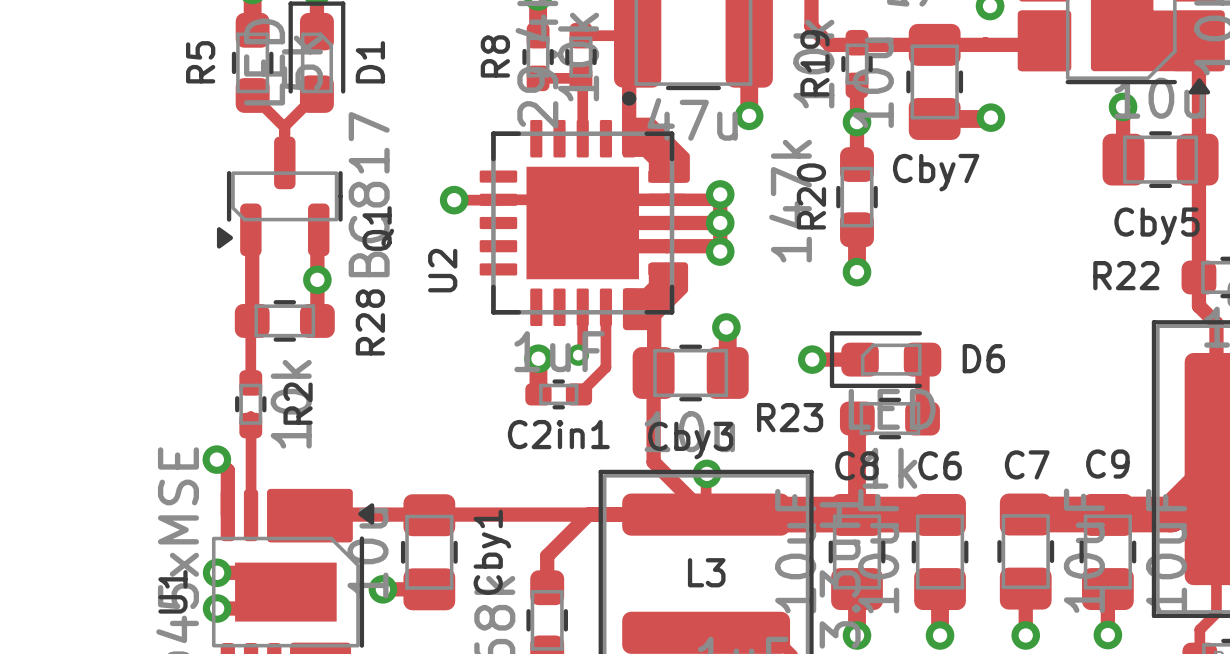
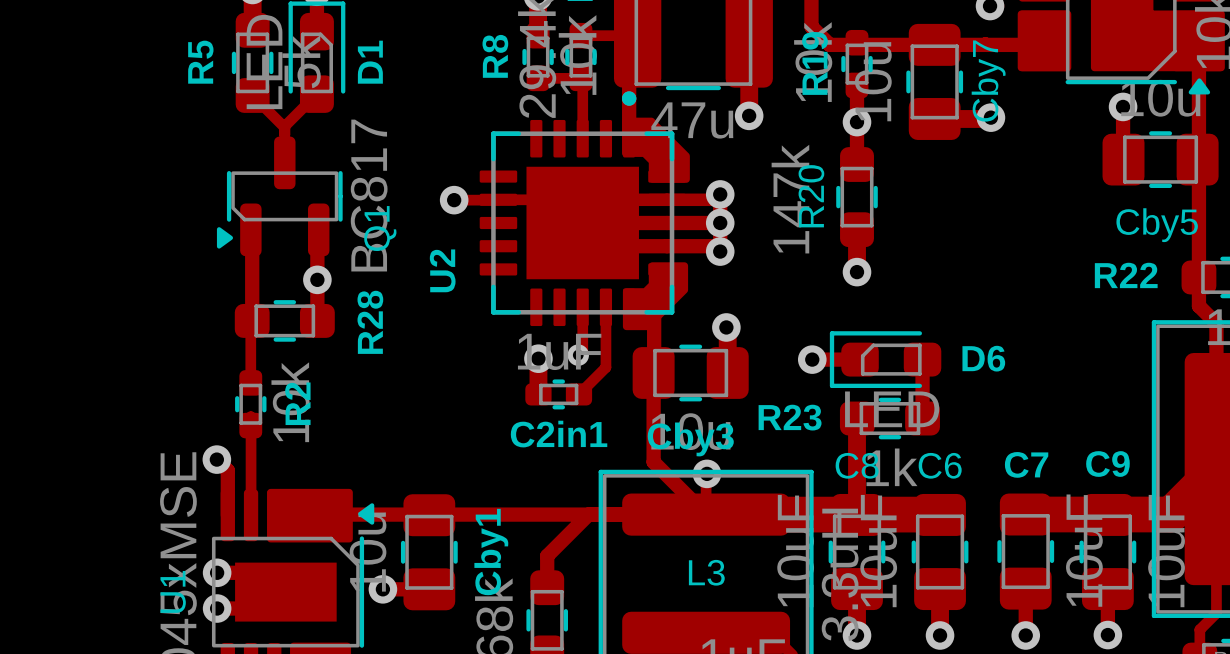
Cby7 name rotation: 0° (936, 172) -> 90° counterclockwise (988, 81)

